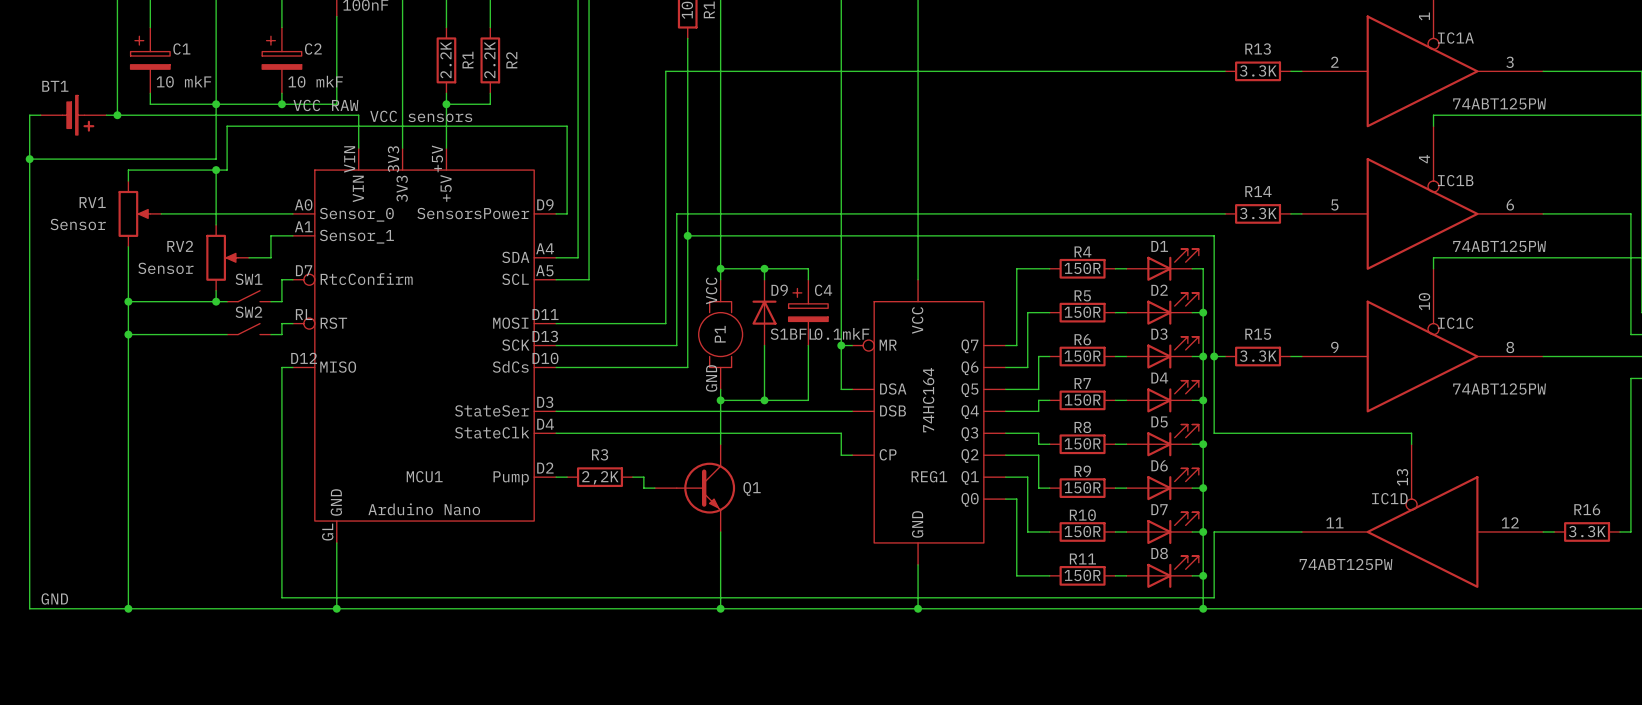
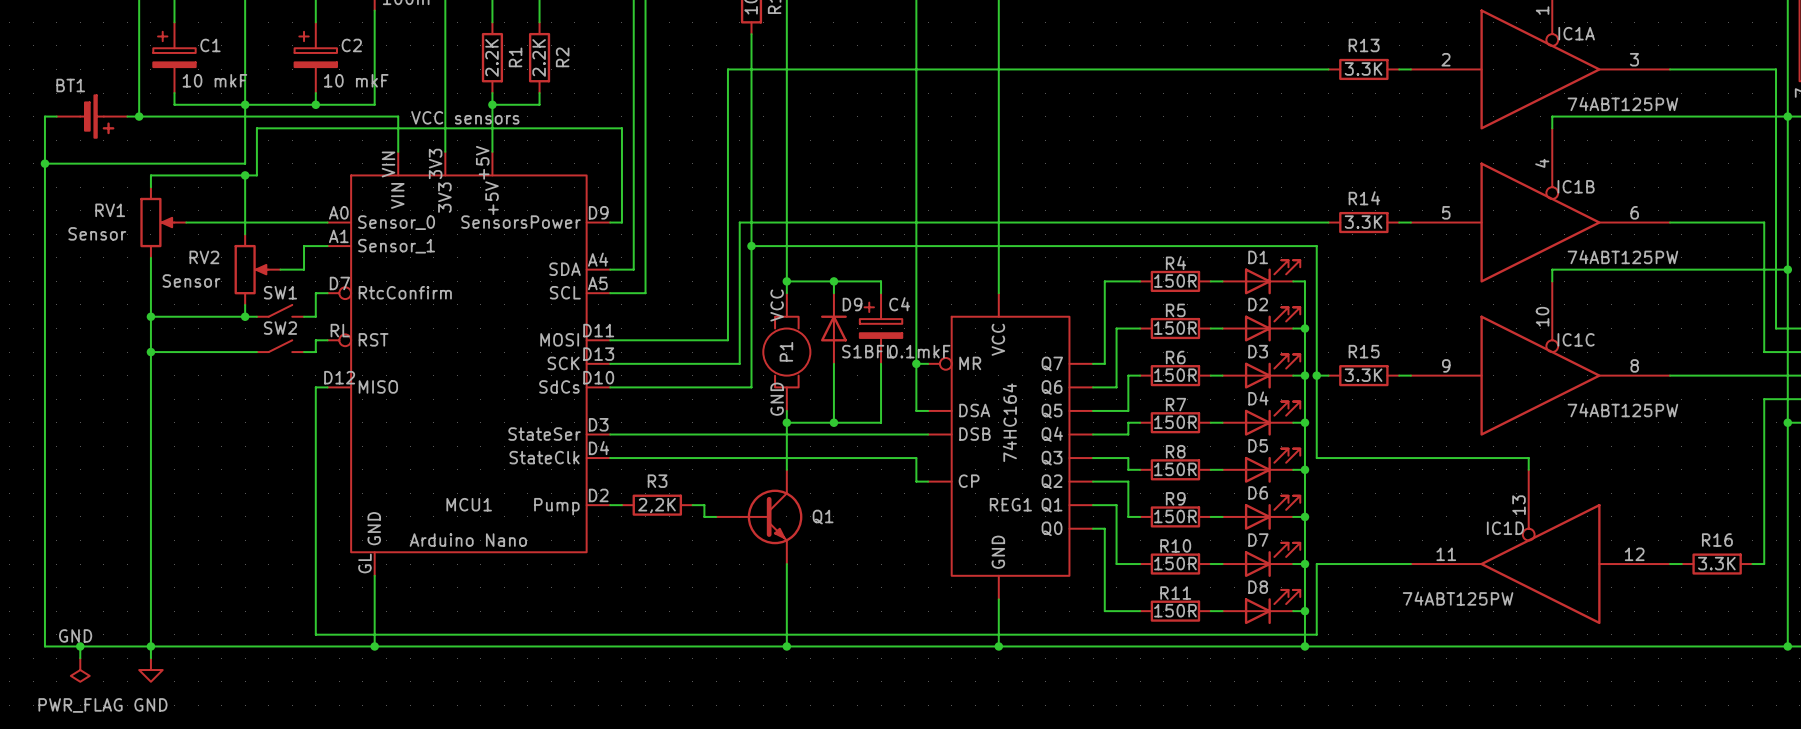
label: VCC RAW (325, 105) -> none
wire: none -> (80, 646) (80, 658)
junction: none -> (80, 646)
wire: none -> (150, 646) (150, 658)
power symbol: none -> PWR_FLAG (80, 670)
power symbol: none -> GND (150, 670)

